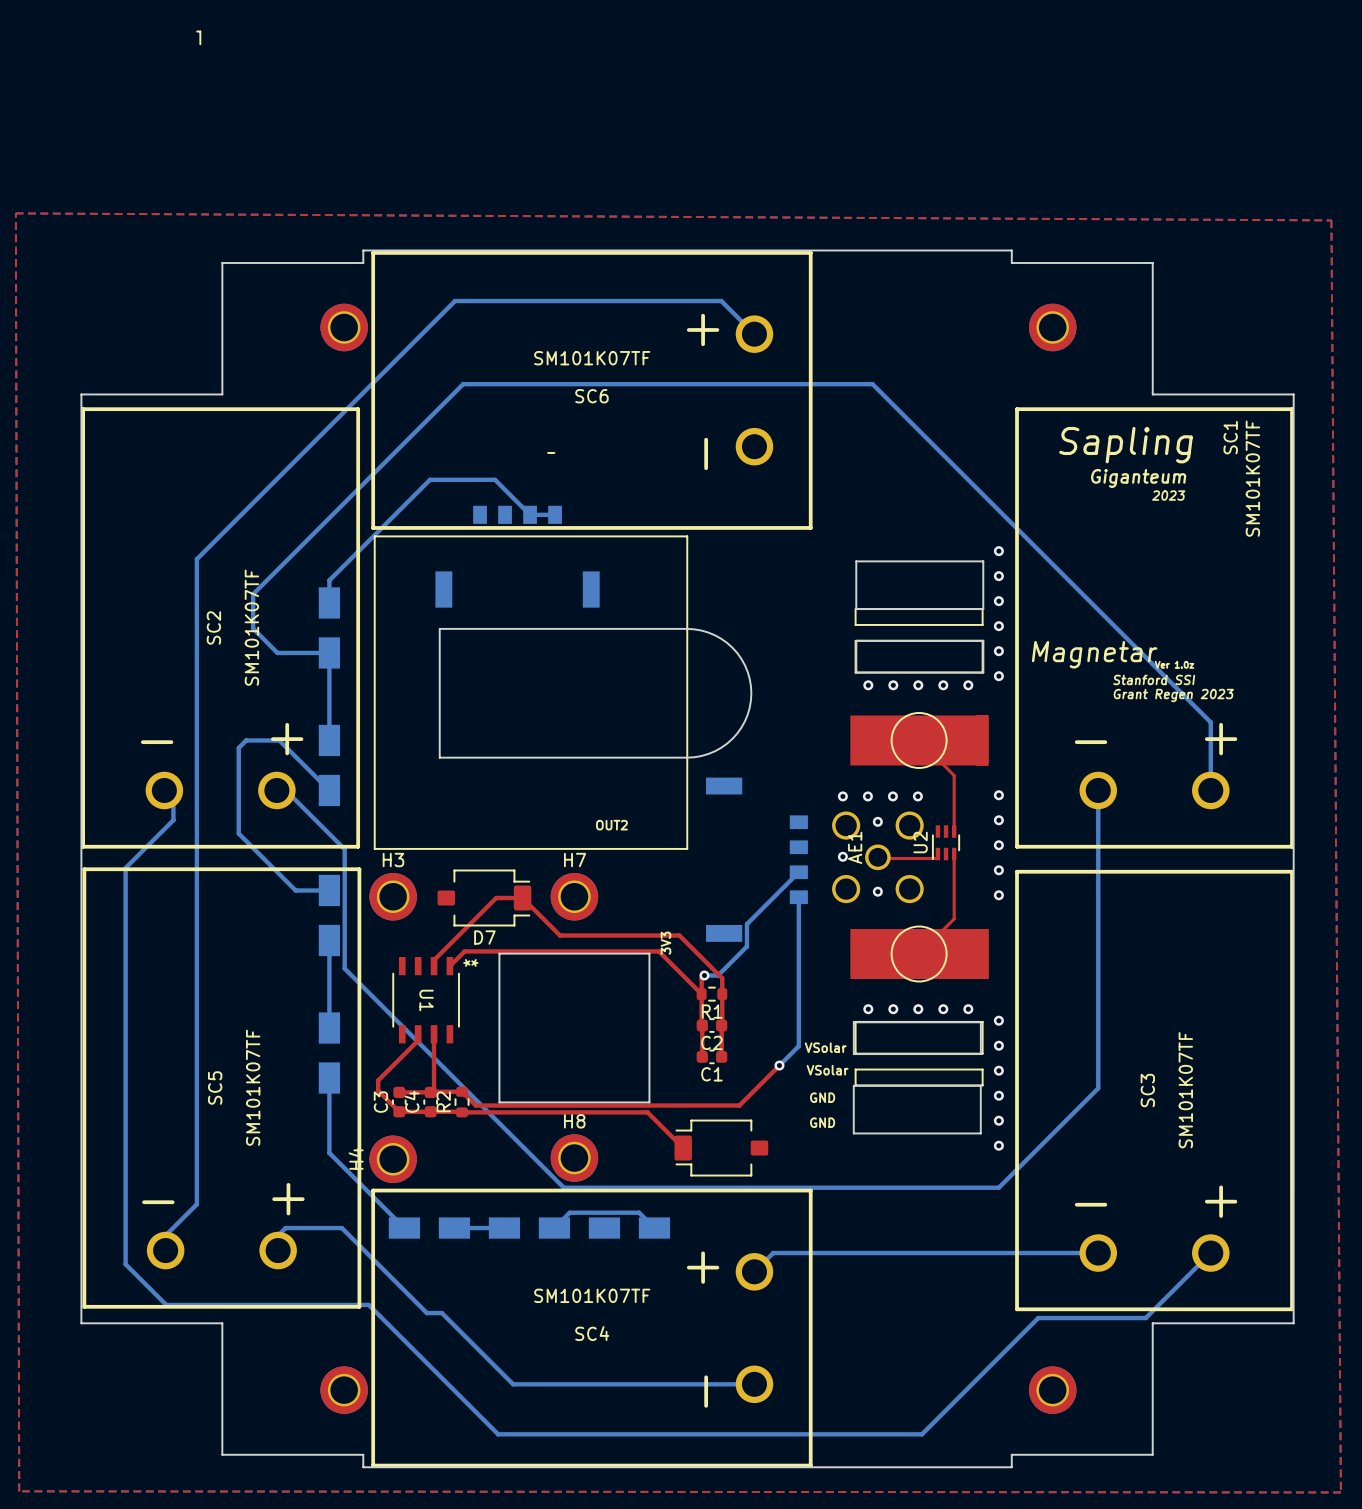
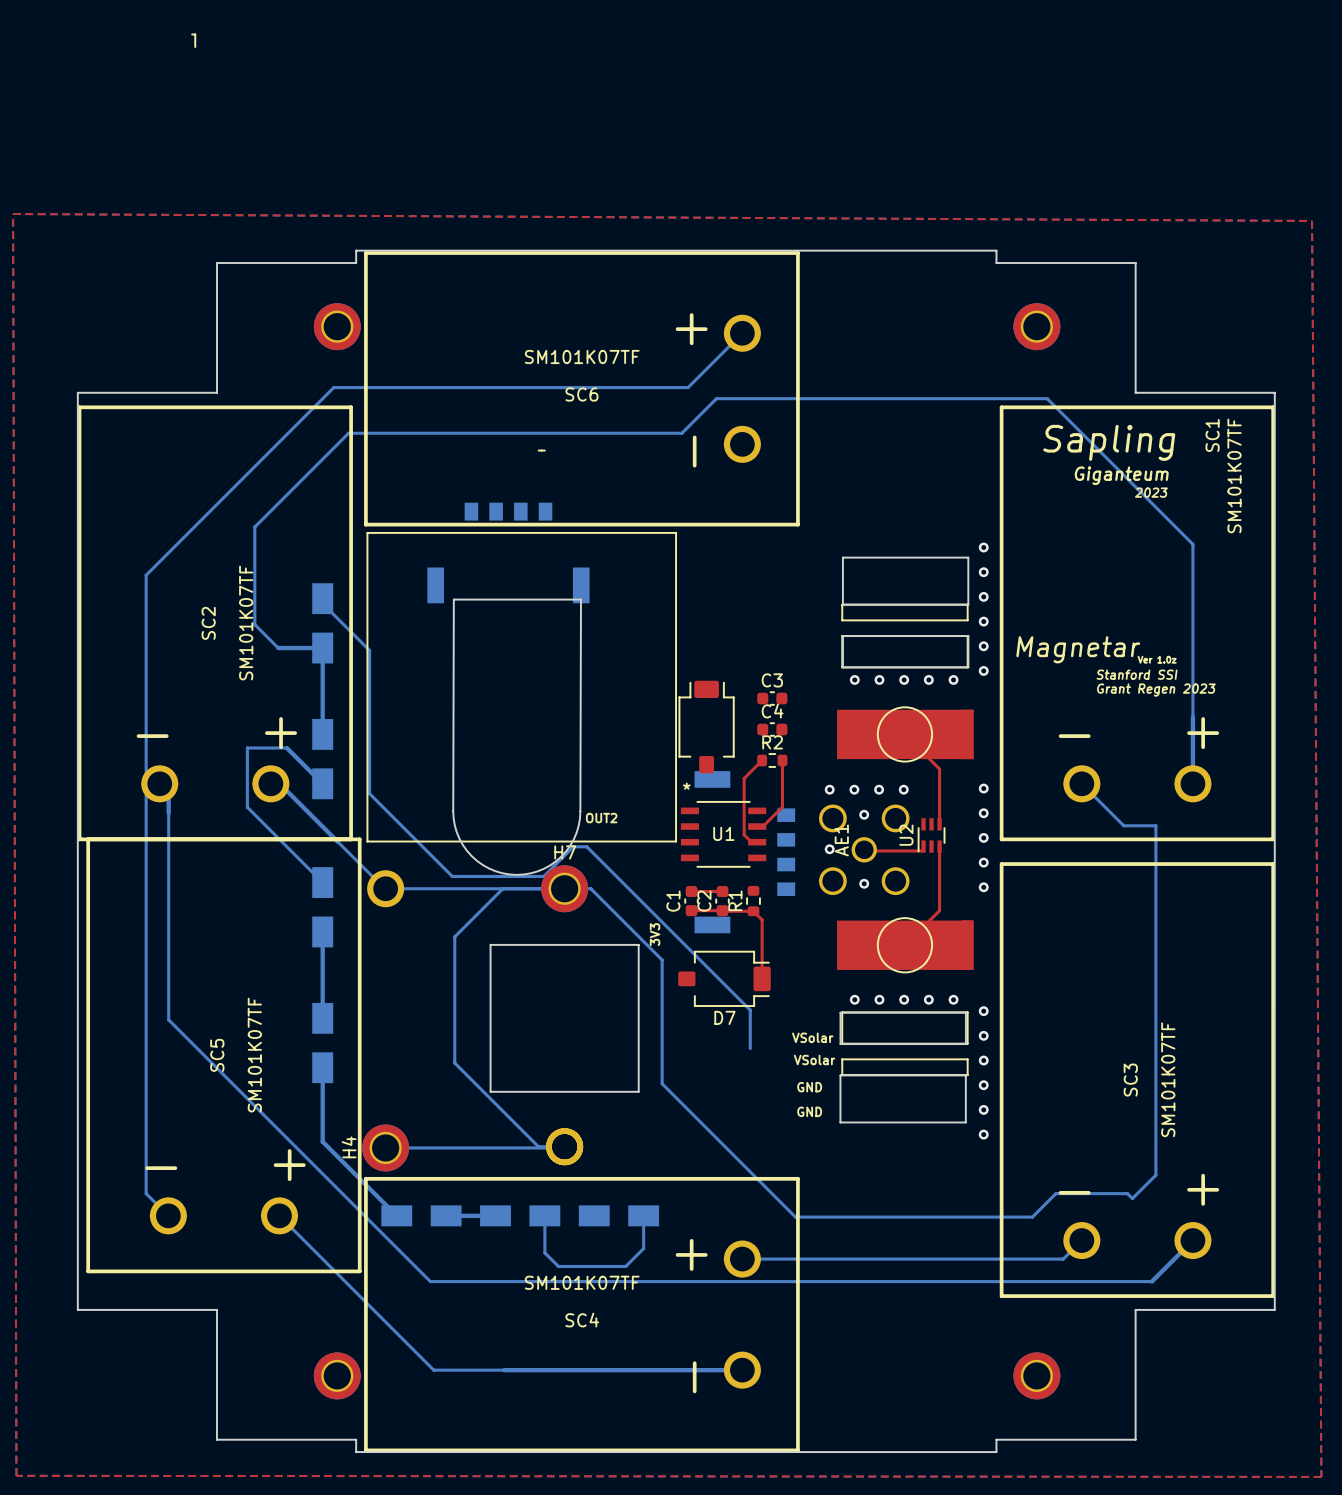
bottom track: (754, 334) (721, 301) (455, 301) (196, 559) (196, 1204) (165, 1235) (165, 1250) -> (742, 333) (688, 387) (333, 387) (146, 575) (146, 1193) (168, 1215)
bottom track: (555, 514) (530, 514) (495, 479) (430, 479) (329, 580) (329, 602) -> (750, 1048) (750, 1010) (586, 846) (573, 846) (543, 876) (452, 876) (369, 793) (369, 650) (322, 603) (322, 598)
board edge: none -> (453, 599) (453, 811) (456, 832) (462, 845) (471, 856) (489, 868) (509, 874) (523, 874) (537, 871) (550, 865) (566, 850) (574, 838) (579, 818) (580, 599) (453, 599)
board edge: (439, 628) (686, 628) (701, 630) (721, 638) (732, 647) (741, 659) (747, 672) (750, 686) (749, 707) (741, 727) (727, 743) (708, 754) (694, 757) (439, 757) (439, 628) -> none
bottom track: (284, 652) (277, 652) (253, 628) (253, 594) (463, 384) (872, 384) (1210, 722) -> (278, 648) (254, 624) (254, 527) (348, 433) (681, 433) (716, 398) (1047, 398) (1192, 544) (1192, 716)
part: none -> (706, 727)
bottom track: (293, 754) (279, 740) (246, 740) (238, 747) (238, 833) (295, 890) (329, 890) -> (286, 748) (247, 748) (247, 807) (322, 882)
top track: none -> (762, 760) (744, 778) (744, 834) (751, 842) (757, 842)
top track: none -> (782, 760) (782, 806) (762, 826) (757, 826)
bottom track: (1100, 787) (1098, 789) (1098, 1088) (998, 1187) (563, 1187) (344, 968) (344, 849) -> (1081, 783) (1123, 825) (1155, 825) (1155, 1175) (1132, 1198) (1127, 1193) (1055, 1193) (1032, 1217) (795, 1217) (662, 1083) (662, 960) (590, 888) (384, 888) (337, 841)
bottom track: (173, 820) (125, 867) (125, 1264) (166, 1304) (368, 1304) (498, 1434) (921, 1434) (1038, 1318) (1145, 1318) (1169, 1294) -> (168, 813) (168, 1019) (430, 1281) (1151, 1281)
bottom track: (798, 872) (746, 924) (746, 946) (718, 975) (704, 975) -> none
H3: (393, 896) -> none
part: none -> (385, 888)
bottom track: none -> (502, 888) (454, 936) (454, 1063) (538, 1146) (564, 1146) (385, 1147)
bottom track: (798, 897) (798, 1046) (779, 1065) -> none
D7 position: (484, 898) -> (724, 978)
top track: none -> (691, 891) (722, 891)
top track: none -> (691, 910) (753, 911) (762, 919) (762, 978)
top track: (434, 966) (434, 960) (496, 898) (522, 898) (560, 935) (679, 935) (722, 978) (721, 1056) -> none
top track: (449, 966) (464, 951) (658, 951) (701, 994) -> none
top track: (704, 975) (701, 978) (702, 1056) -> none
via: (704, 975) -> none
R1 rotation: 0° (711, 994) -> 90° clockwise (753, 901)
R1 position: (711, 994) -> (753, 901)
U1 rotation: 0° (426, 1000) -> 90° counterclockwise (723, 834)
U1 position: (426, 1000) -> (723, 834)
C2 rotation: 0° (711, 1025) -> 90° clockwise (722, 901)
C2 position: (711, 1025) -> (722, 901)
top track: (418, 1034) (418, 1040) (378, 1080) (378, 1090) (399, 1111) (647, 1112) (683, 1148) -> none
top track: (434, 1034) (434, 1089) (430, 1092) (399, 1092) -> none
C1 rotation: 0° (711, 1056) -> 90° clockwise (691, 901)
C1 position: (711, 1056) -> (691, 901)
top track: (779, 1065) (739, 1105) (475, 1105) (462, 1091) (431, 1091) -> none
via: (779, 1065) -> none
SC5 position: (221, 1088) -> (223, 1055)
C3 rotation: 0° (399, 1102) -> 90° clockwise (772, 698)
C3 position: (399, 1102) -> (772, 698)
C4 rotation: 0° (430, 1102) -> 90° clockwise (772, 729)
C4 position: (430, 1102) -> (772, 729)
R2 rotation: 0° (462, 1102) -> 90° clockwise (772, 760)
R2 position: (462, 1102) -> (772, 760)
part: (721, 1148) -> none
H8: (574, 1158) -> none
part: none -> (564, 1146)
bottom track: (554, 1228) (569, 1212) (639, 1212) (654, 1228) -> (544, 1215) (544, 1252) (558, 1266) (625, 1266) (643, 1248) (643, 1215)
bottom track: (278, 1250) (278, 1235) (285, 1228) (341, 1228) (426, 1313) (441, 1313) (513, 1384) -> (279, 1215) (433, 1370) (504, 1370)
bottom track: (1098, 1253) (773, 1253) (754, 1271) -> (1081, 1240) (1063, 1259) (742, 1259)

